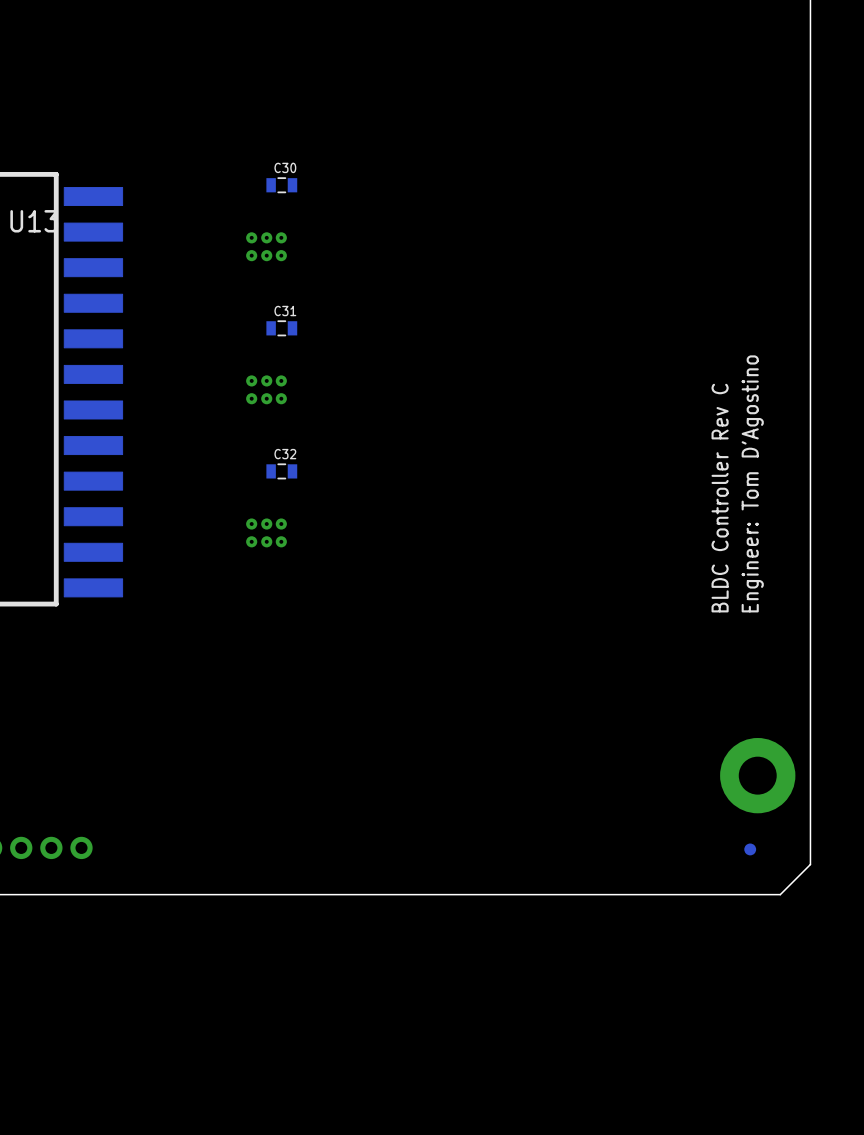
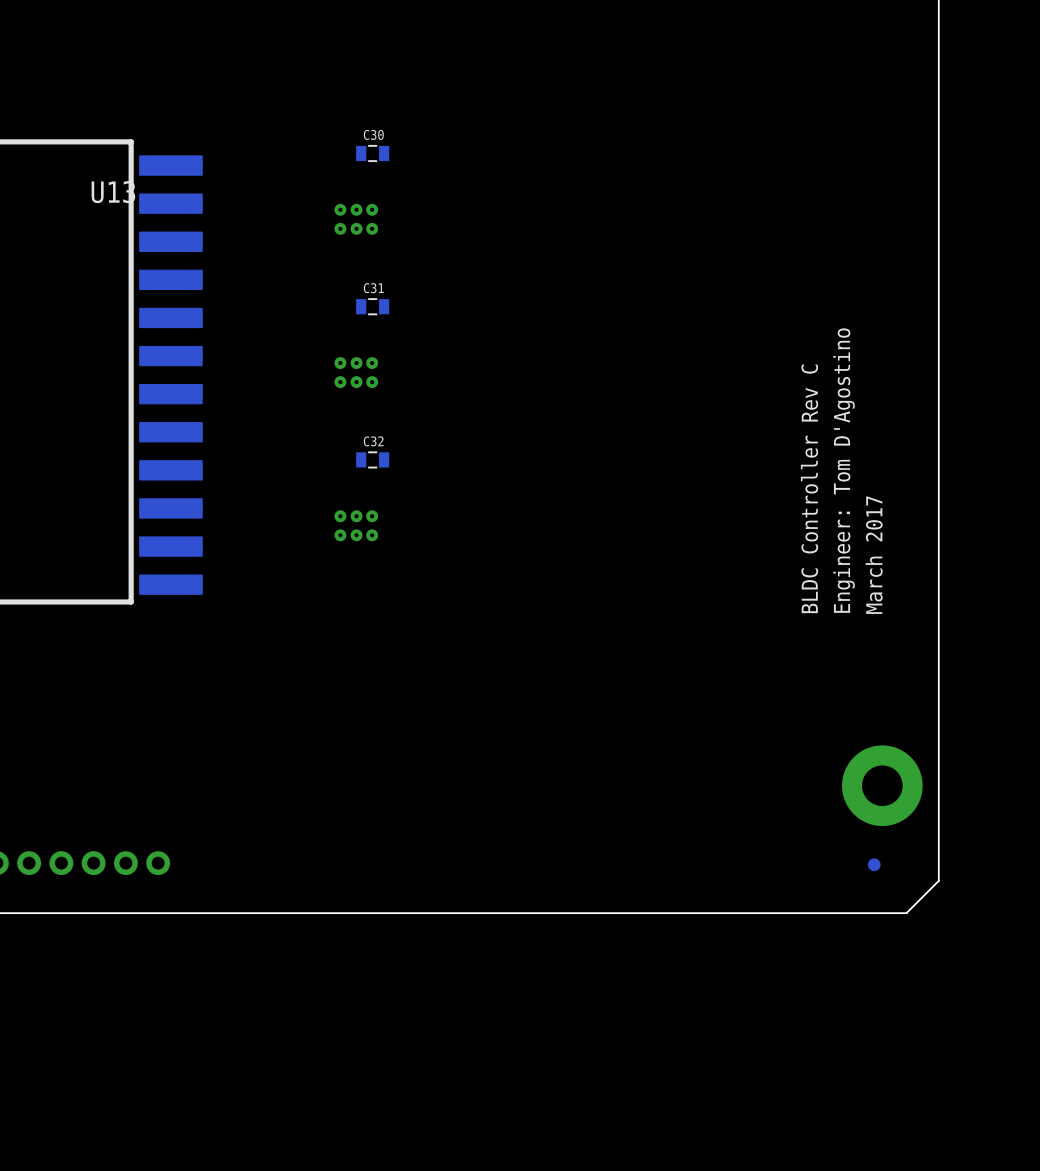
text: Engineer: Tom D'Agostino (752, 483) -> March 2017 (874, 555)
text: none -> BLDC Controller Rev C (809, 488)
text: BLDC Controller Rev C (720, 498) -> Engineer: Tom D'Agostino (844, 470)

